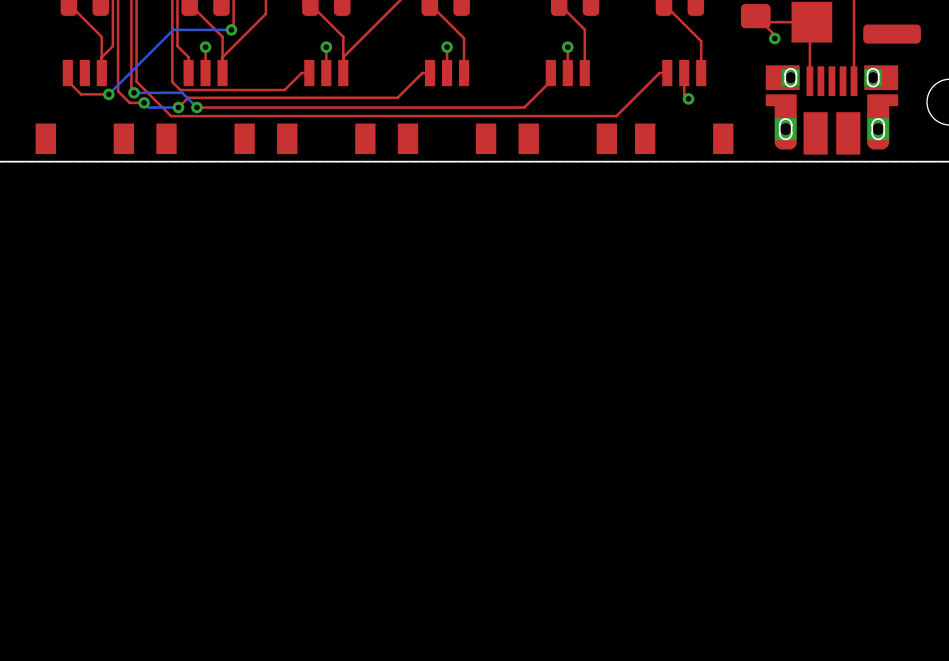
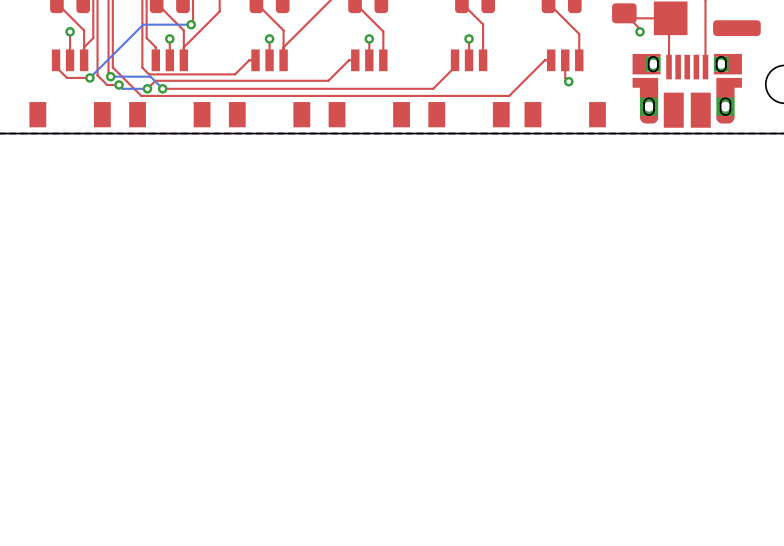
top track: none -> (70, 31) (70, 60)
via: none -> (70, 31)

